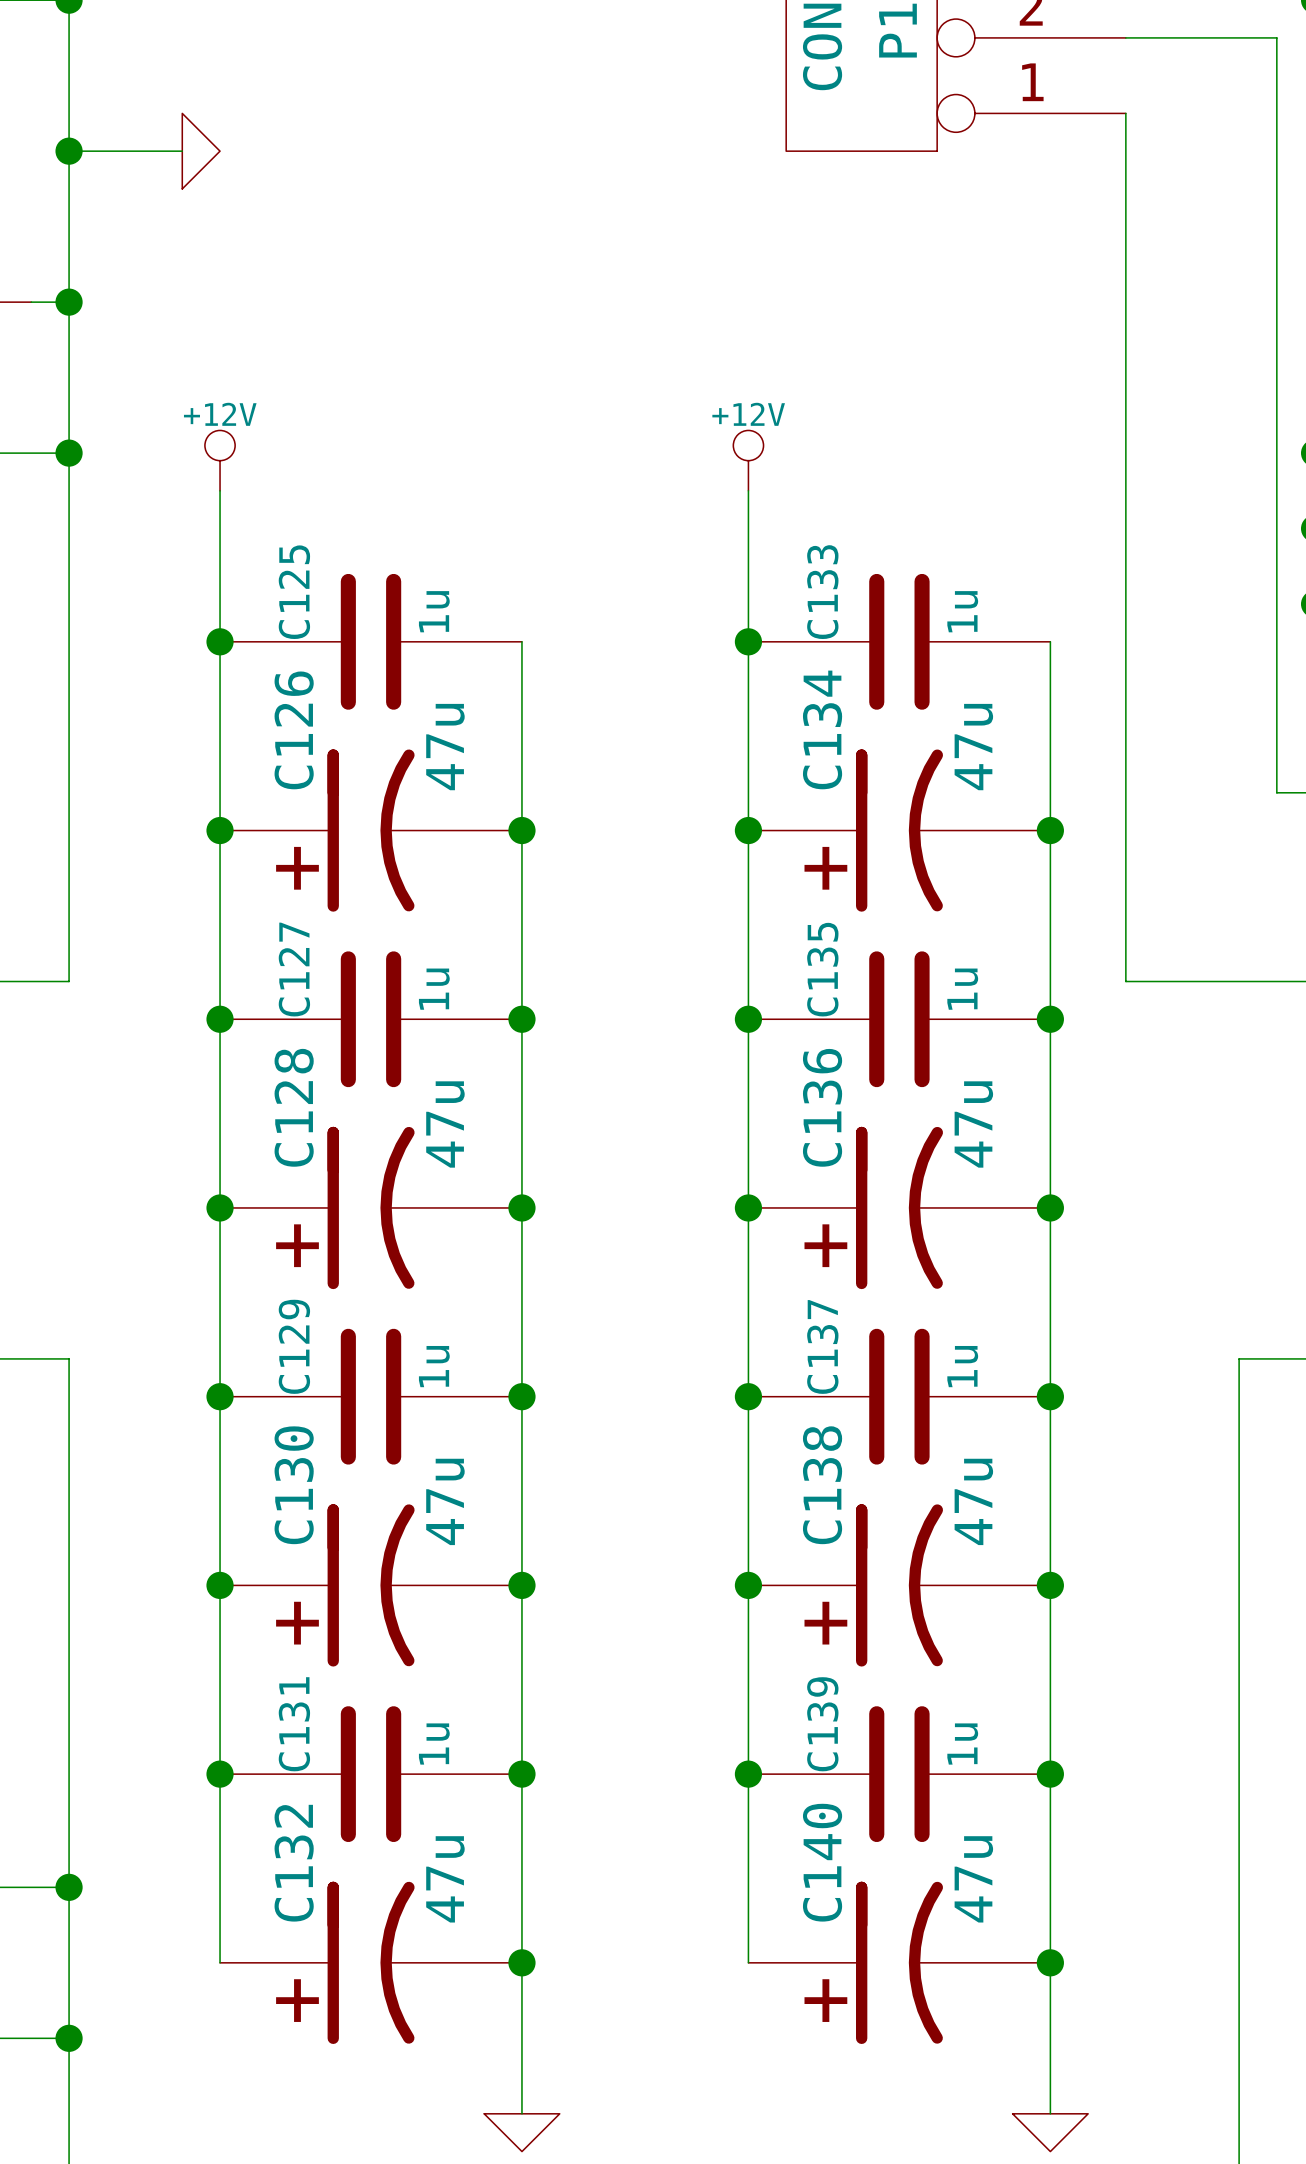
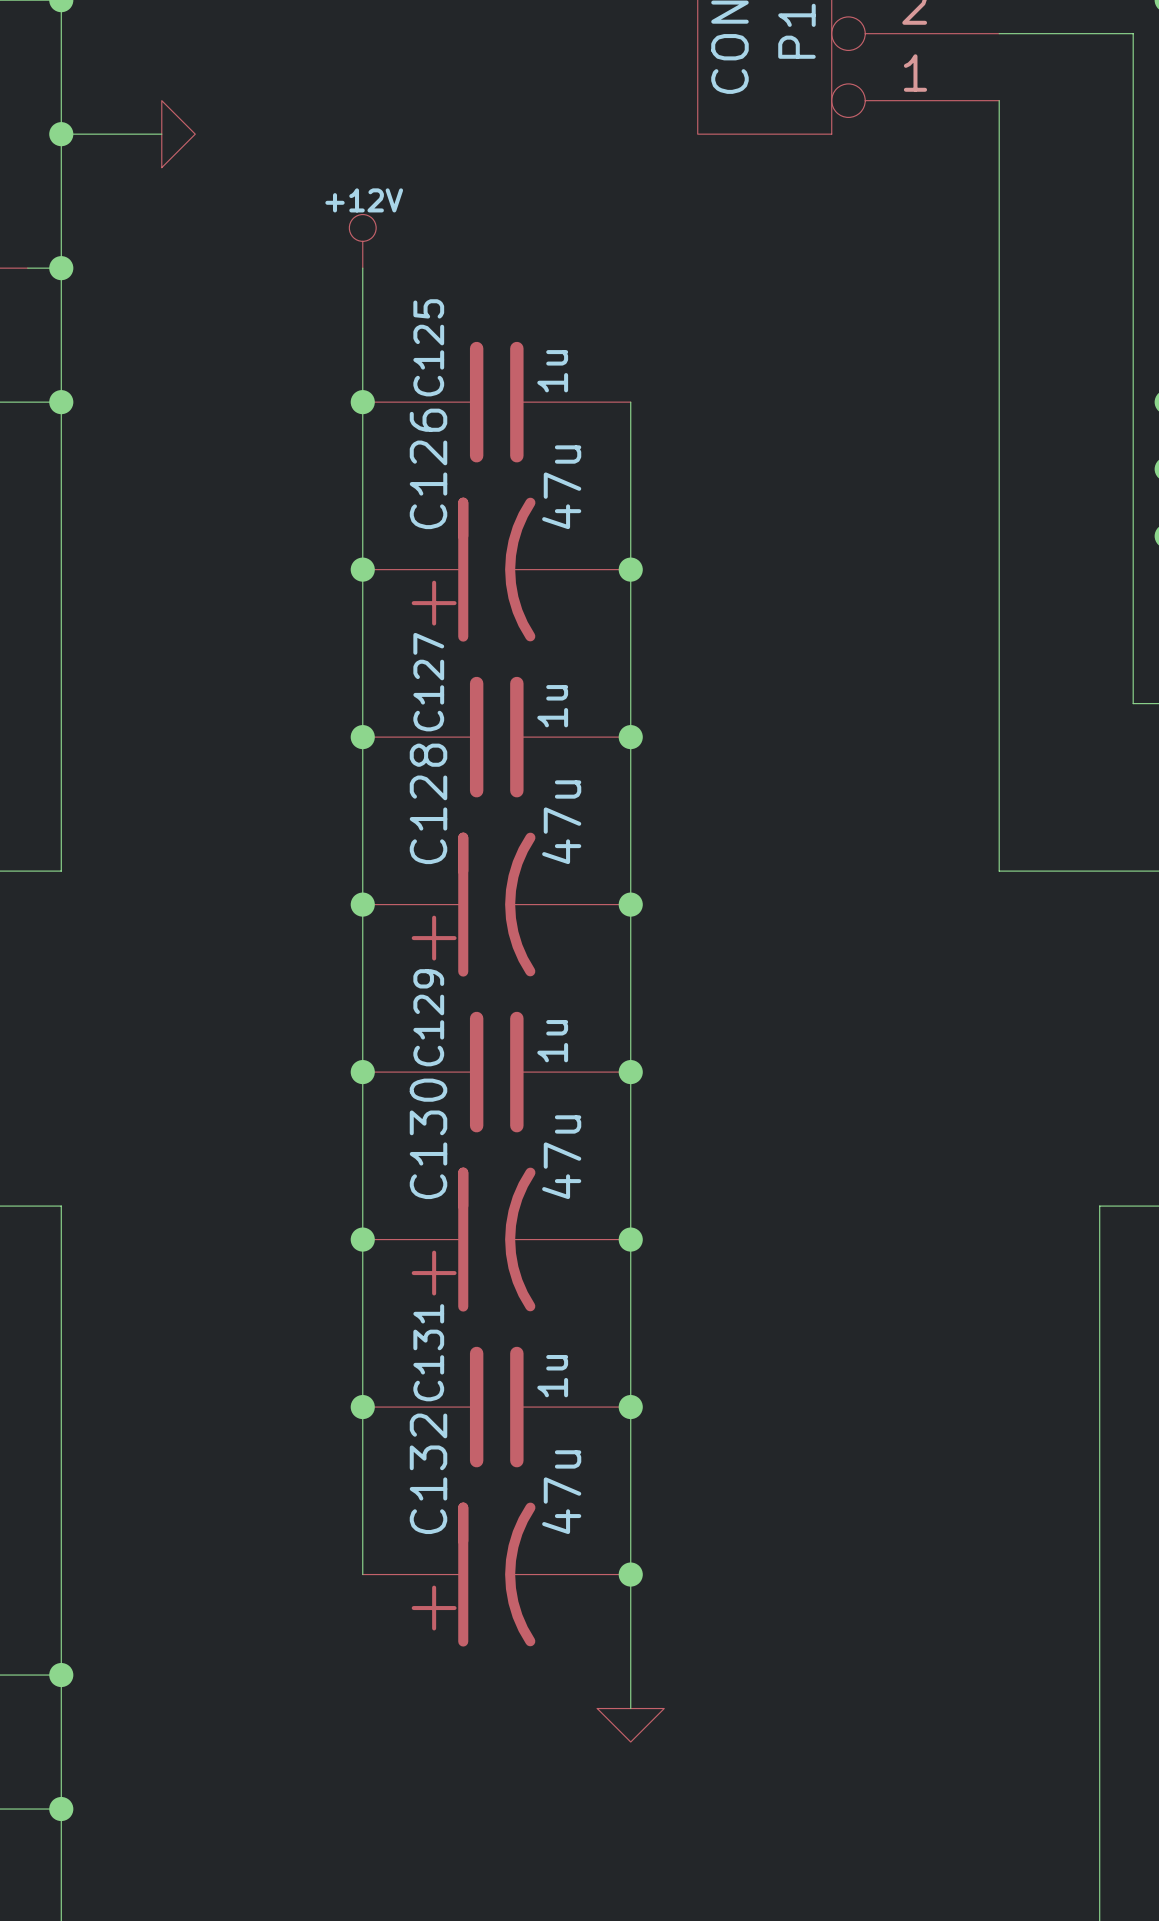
power symbol: none -> +12V (362, 241)
junction: none -> (362, 402)
power symbol: +12V (220, 460) -> none
power symbol: +12V (748, 460) -> none
wire: (220, 490) (220, 1962) -> (362, 268) (362, 1574)
wire: (748, 490) (748, 1962) -> none
junction: (220, 641) -> none
C125 position: (371, 641) -> (496, 402)
junction: none -> (362, 569)
wire: (521, 641) (521, 2113) -> (630, 402) (630, 1708)
junction position: (748, 641) -> (630, 569)
C133: 1u (899, 641) -> none
wire: (1050, 641) (1050, 2113) -> none
junction: (220, 830) -> none
C126 position: (371, 830) -> (496, 569)
junction: none -> (362, 737)
junction: (521, 830) -> none
junction position: (748, 830) -> (630, 737)
C134: 47u (899, 830) -> none
junction: (1050, 830) -> none
junction: (220, 1019) -> none
C127 position: (371, 1019) -> (496, 737)
junction: none -> (362, 904)
junction: (521, 1019) -> none
junction position: (748, 1019) -> (630, 904)
C135: 1u (899, 1019) -> none
junction: (1050, 1019) -> none
junction: (220, 1207) -> none
C128 position: (371, 1207) -> (496, 904)
junction: none -> (362, 1072)
junction: (521, 1207) -> none
junction position: (748, 1207) -> (630, 1072)
C136: 47u (899, 1207) -> none
junction: (1050, 1207) -> none
junction: (220, 1396) -> none
C129 position: (371, 1396) -> (496, 1072)
junction: none -> (362, 1239)
junction: (521, 1396) -> none
junction position: (748, 1396) -> (630, 1239)
C137: 1u (899, 1396) -> none
junction: (1050, 1396) -> none
junction: (220, 1585) -> none
C130 position: (371, 1585) -> (496, 1239)
junction: none -> (362, 1407)
junction: (521, 1585) -> none
junction position: (748, 1585) -> (630, 1407)
C138: 47u (899, 1585) -> none
junction: (1050, 1585) -> none
junction: (220, 1774) -> none
C131 position: (371, 1774) -> (496, 1407)
junction: (521, 1774) -> none
junction position: (748, 1774) -> (630, 1574)
C139: 1u (899, 1774) -> none
junction: (1050, 1774) -> none
power symbol: none -> (630, 1725)
C132 position: (371, 1962) -> (496, 1574)
junction: (521, 1962) -> none
C140: 47u (899, 1962) -> none
junction: (1050, 1962) -> none
power symbol: (521, 2132) -> none
power symbol: (1050, 2132) -> none

